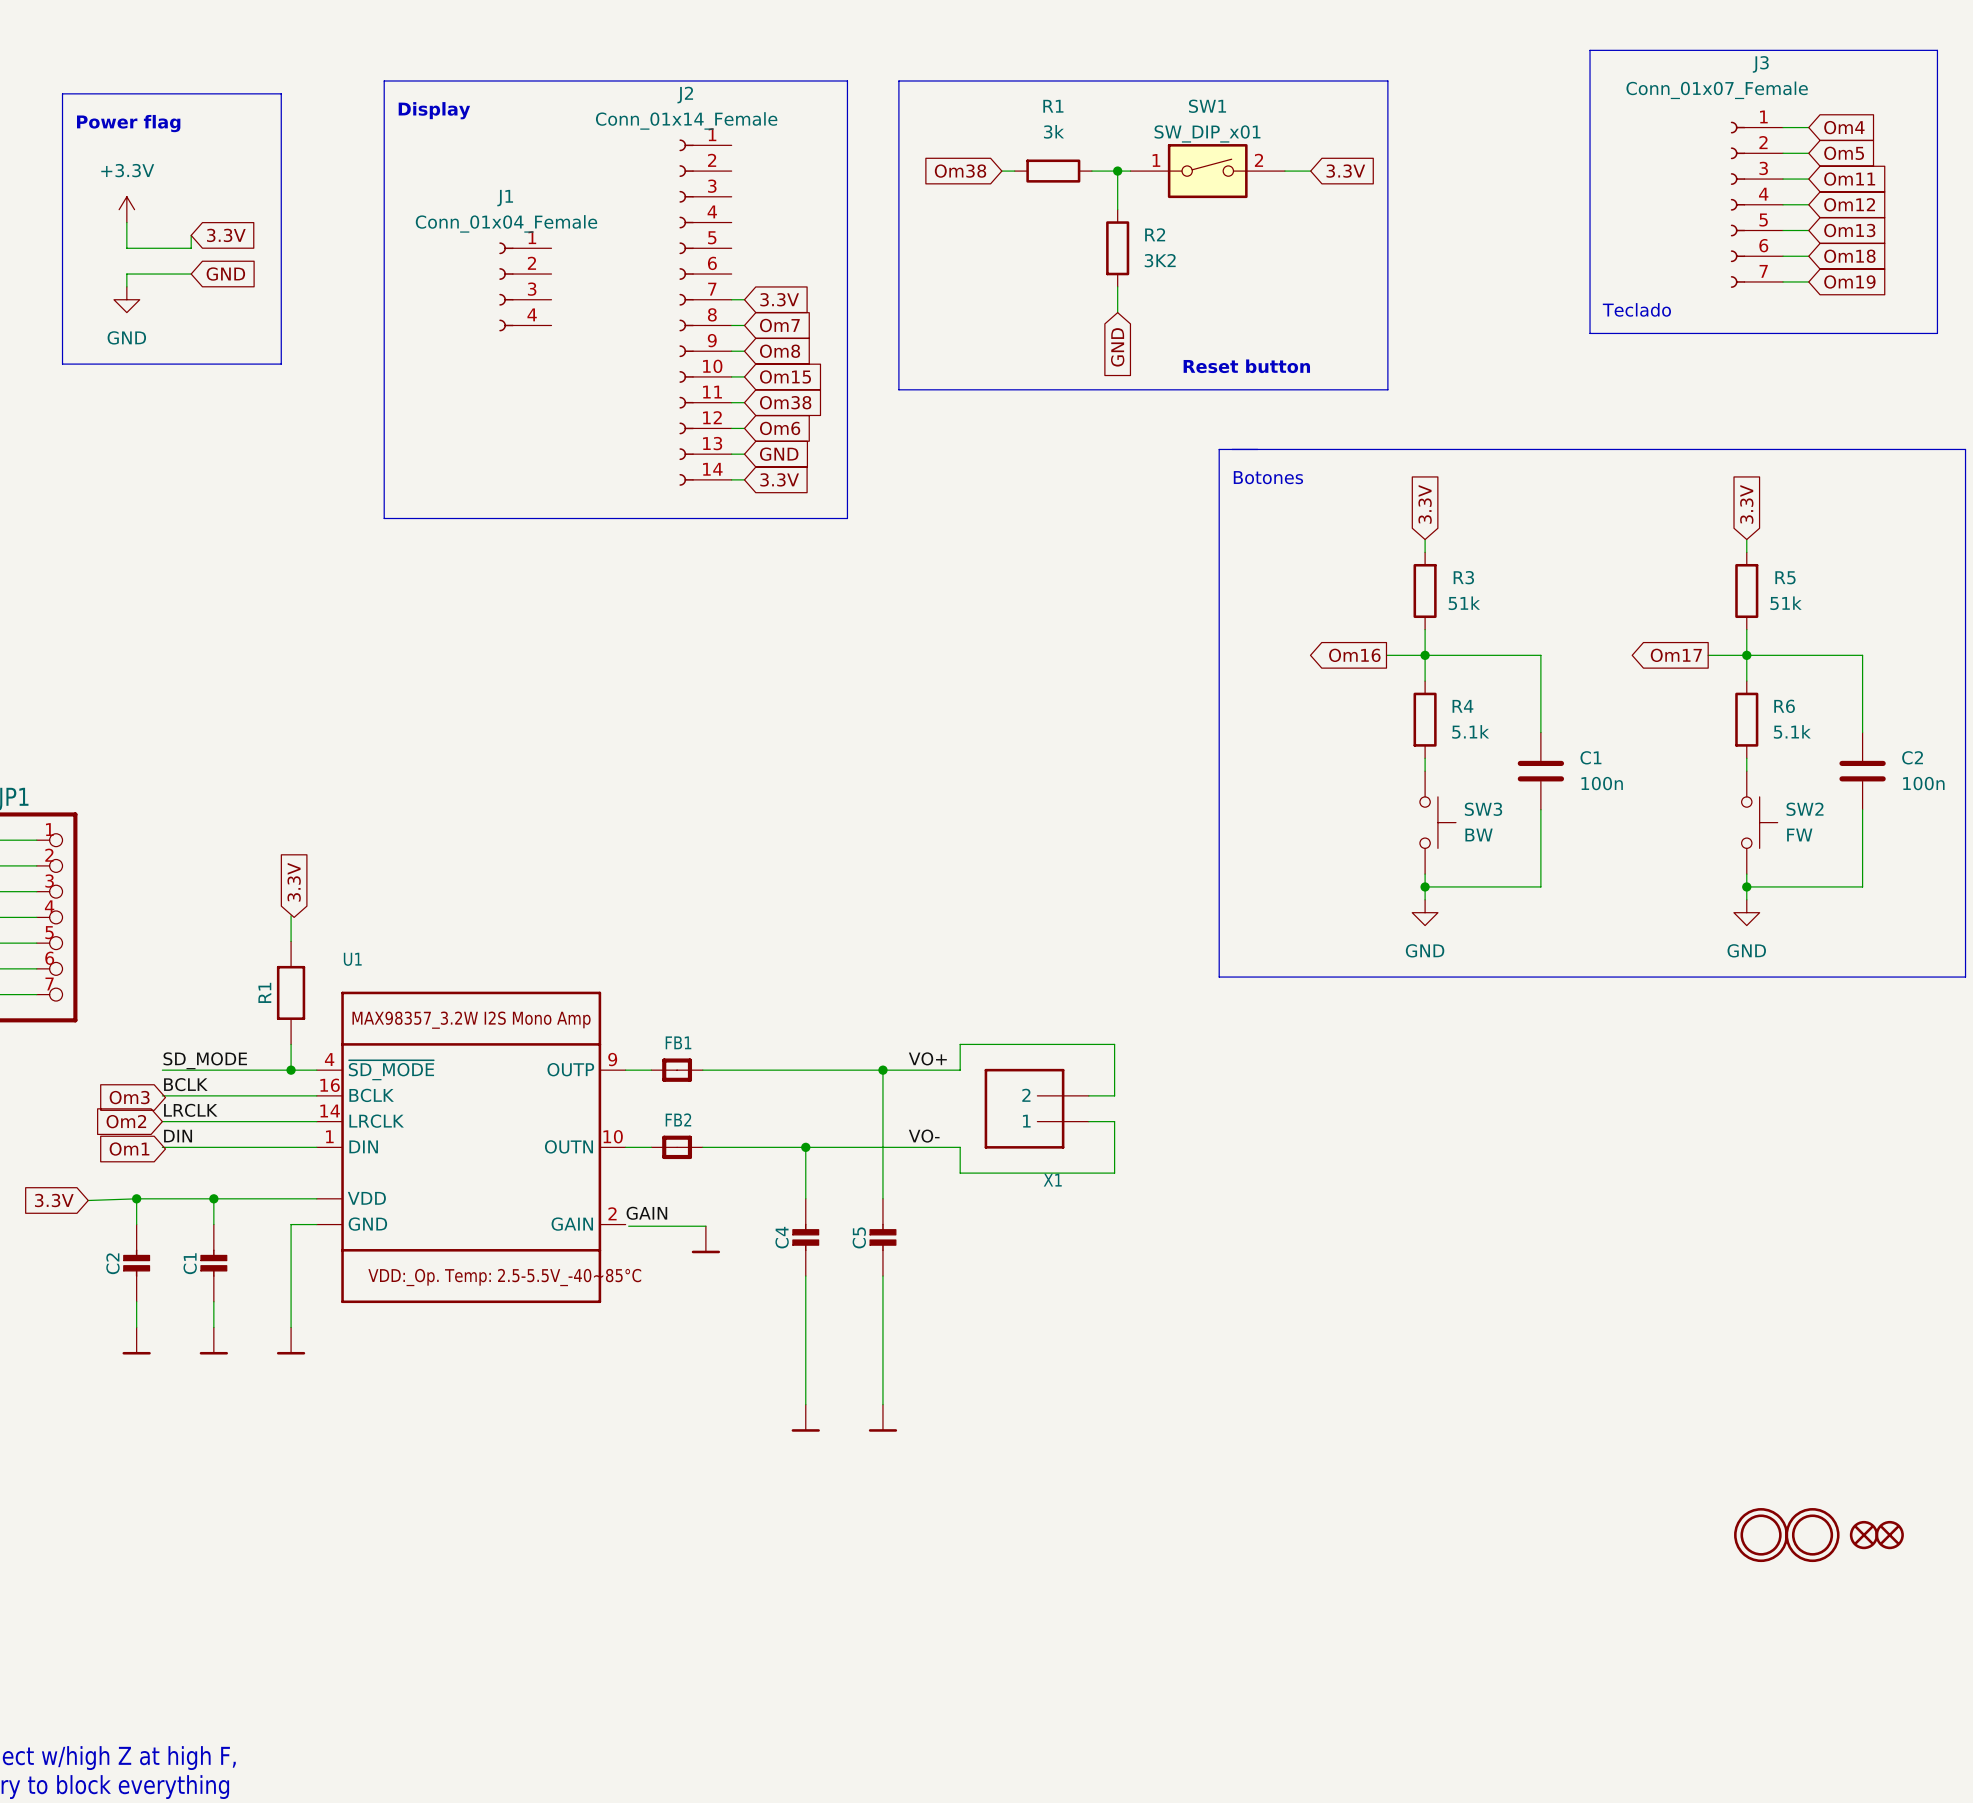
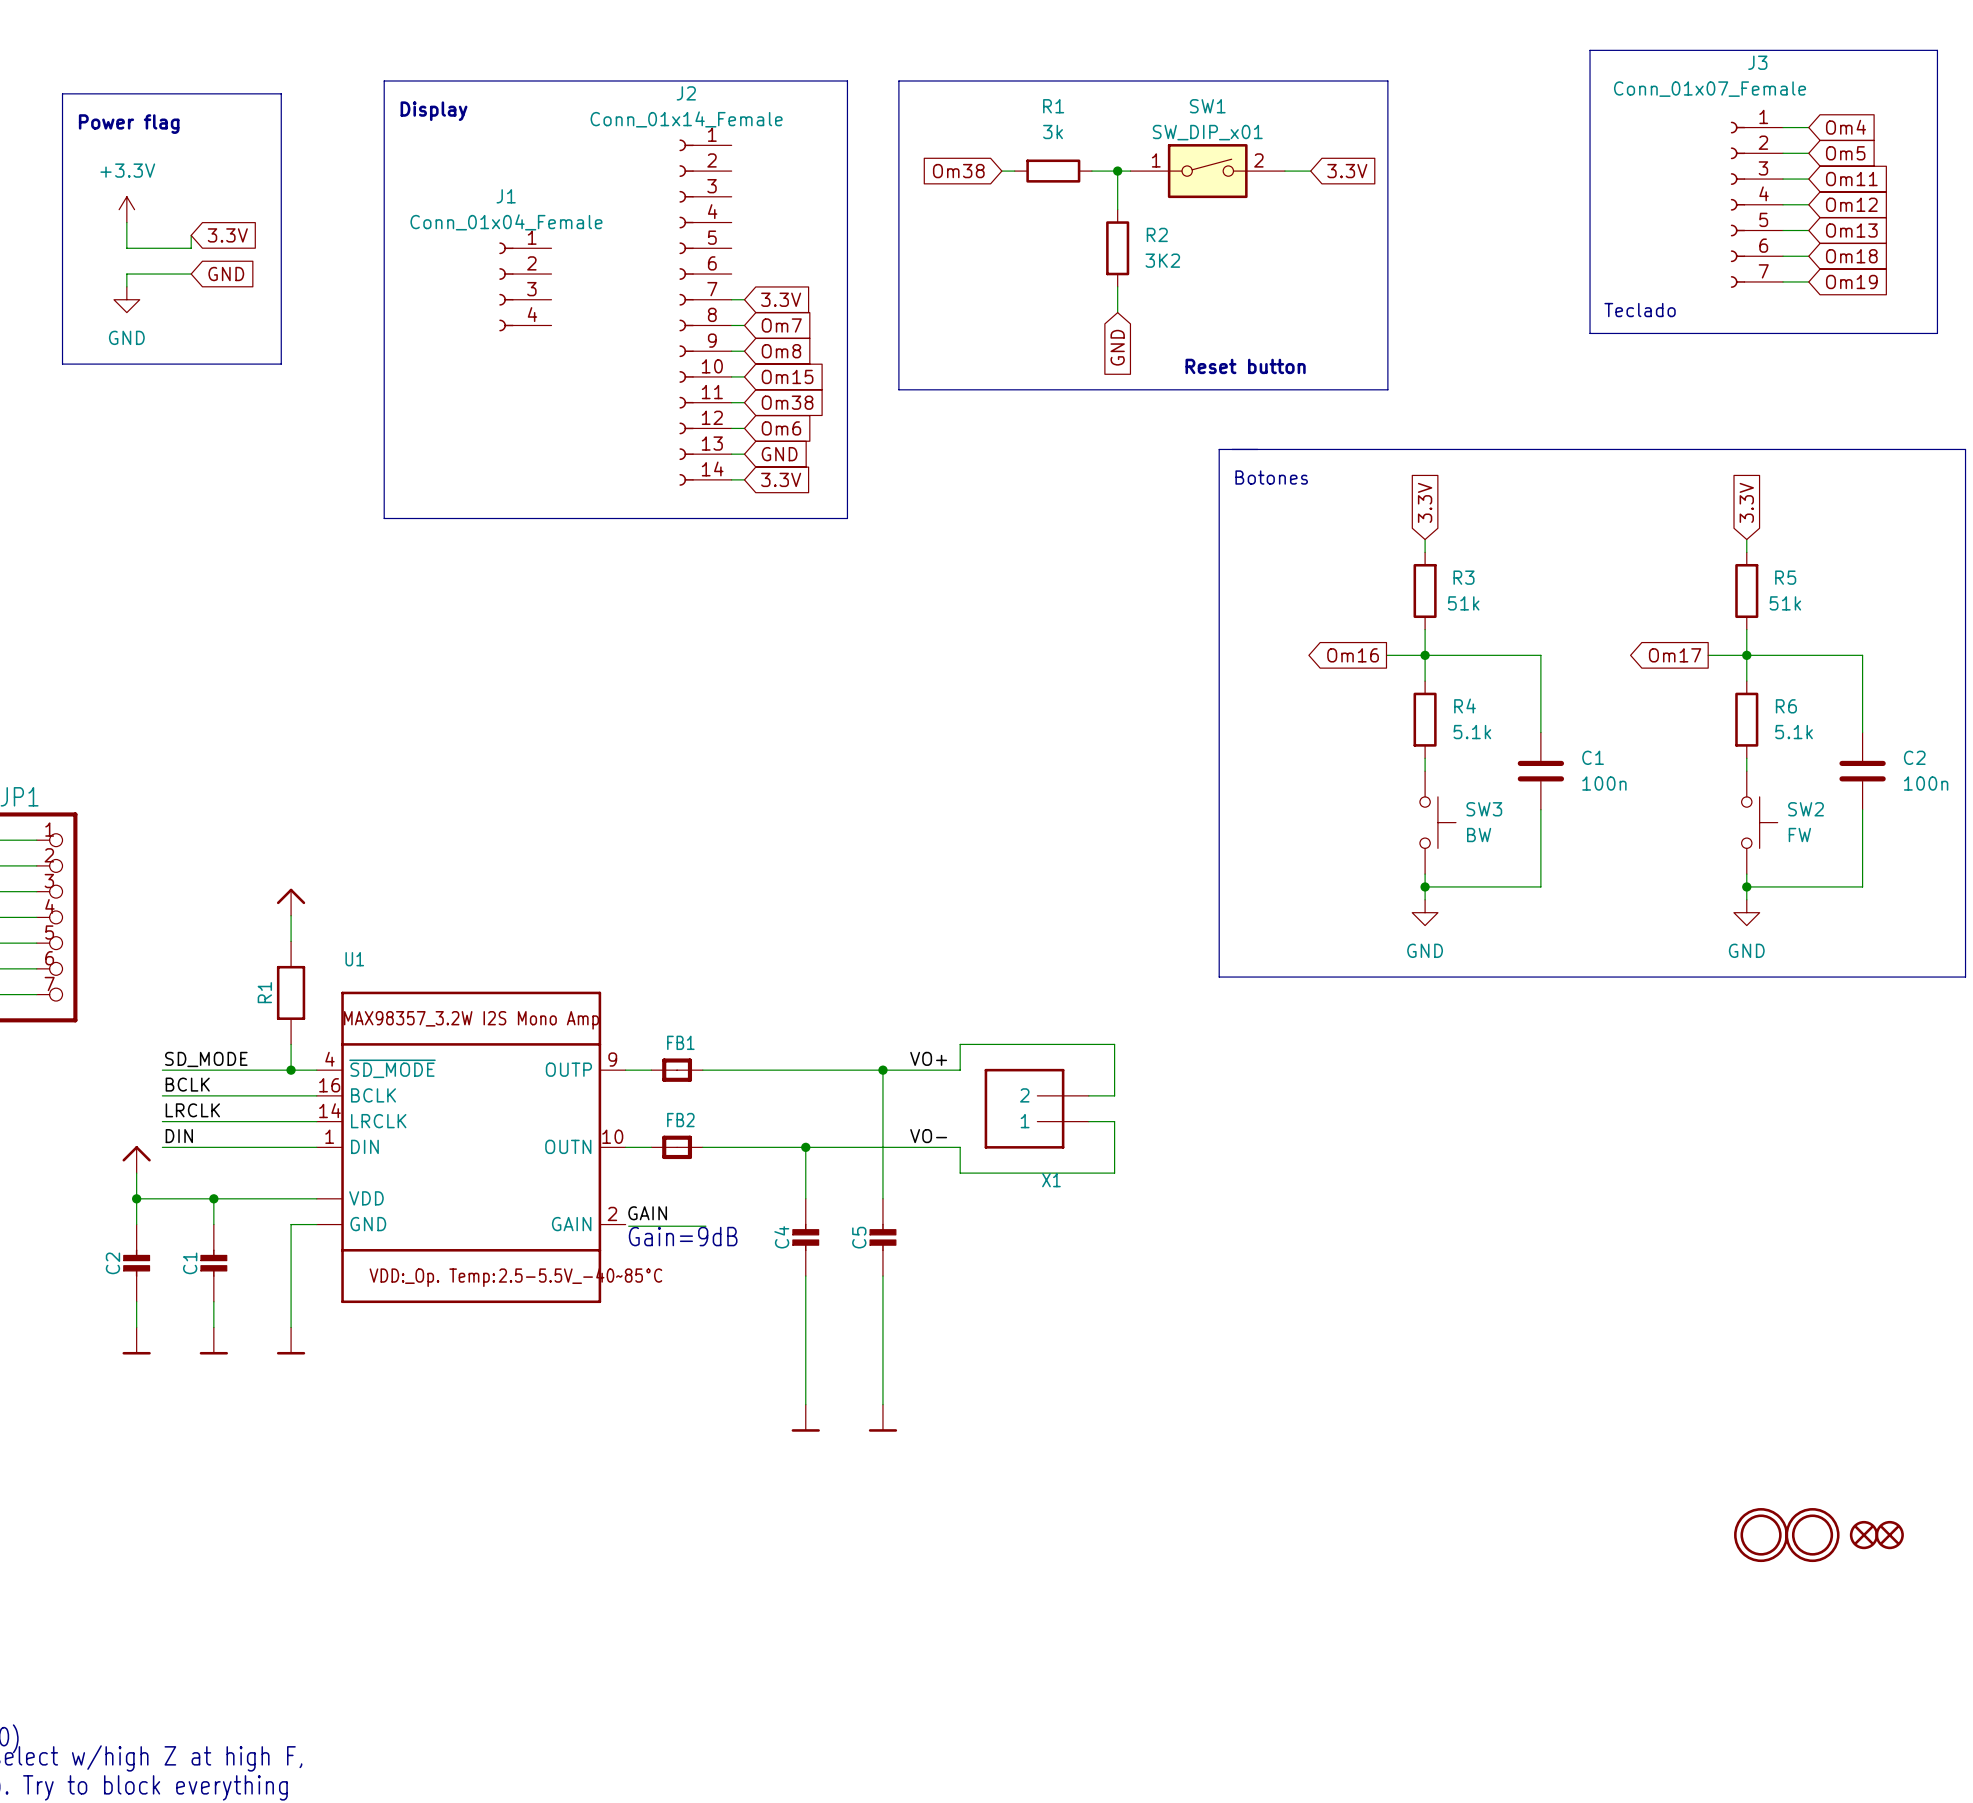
global label: 3.3V (294, 882) -> none
power symbol: none -> (291, 902)
global label: Om3 (129, 1097) -> none
global label: Om2 (126, 1121) -> none
global label: Om1 (129, 1149) -> none
power symbol: none -> (136, 1159)
wire: (136, 1198) (88, 1200) -> (136, 1198) (136, 1173)
global label: 3.3V (54, 1200) -> none
text: none -> Gain=9dB (683, 1236)
power symbol: (705, 1239) -> none

